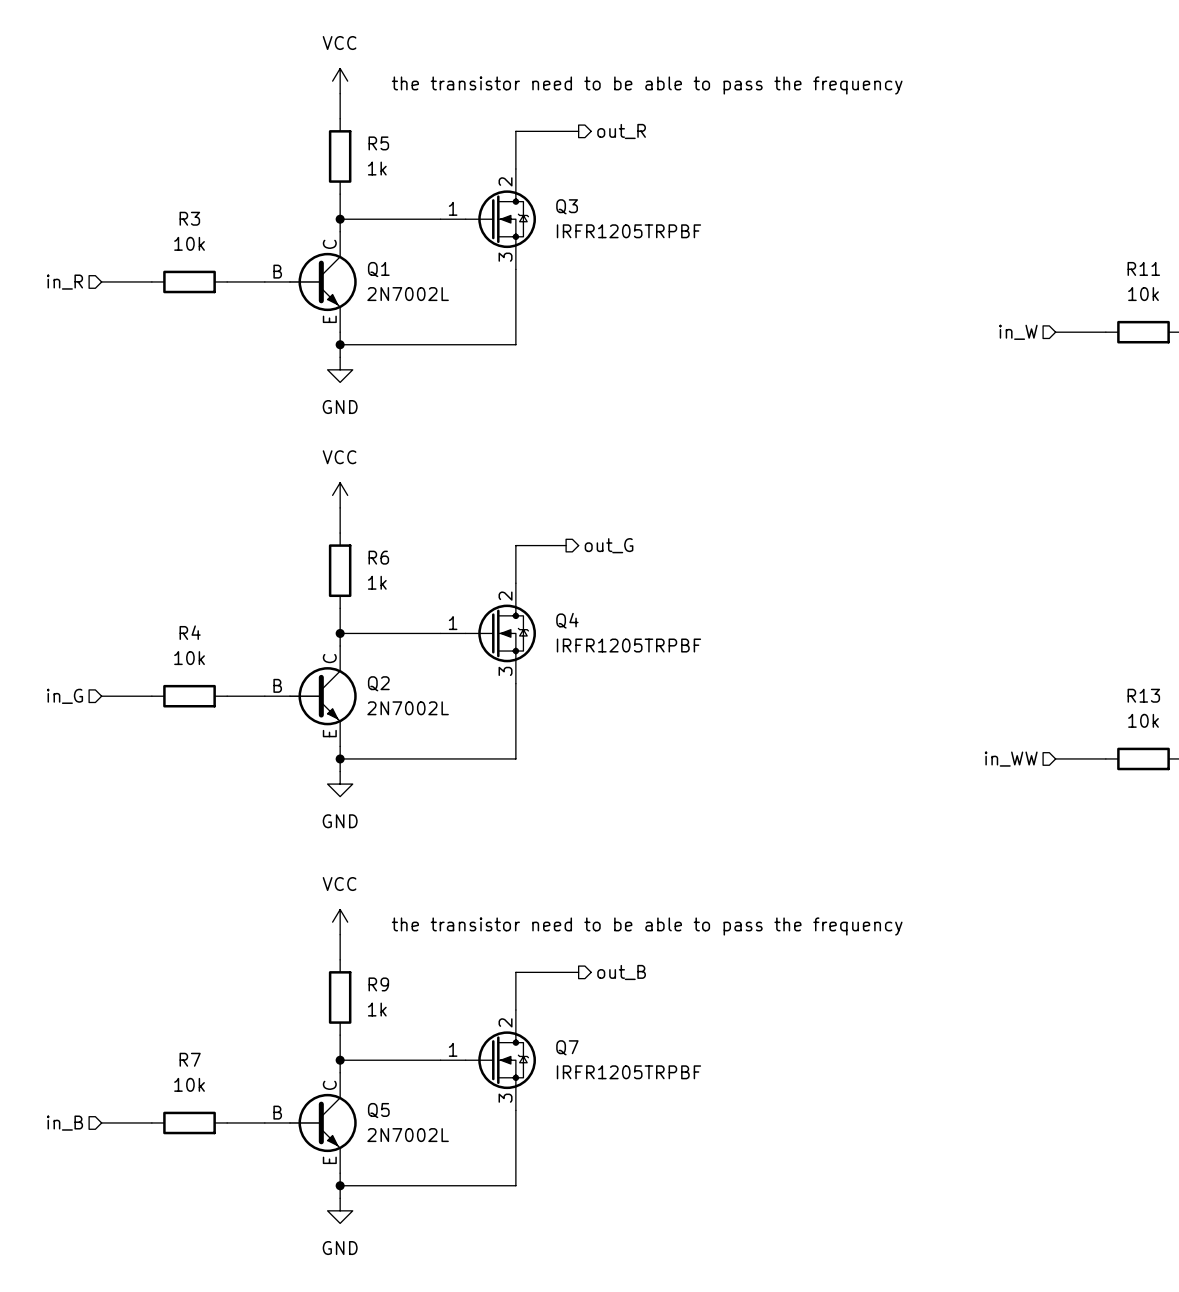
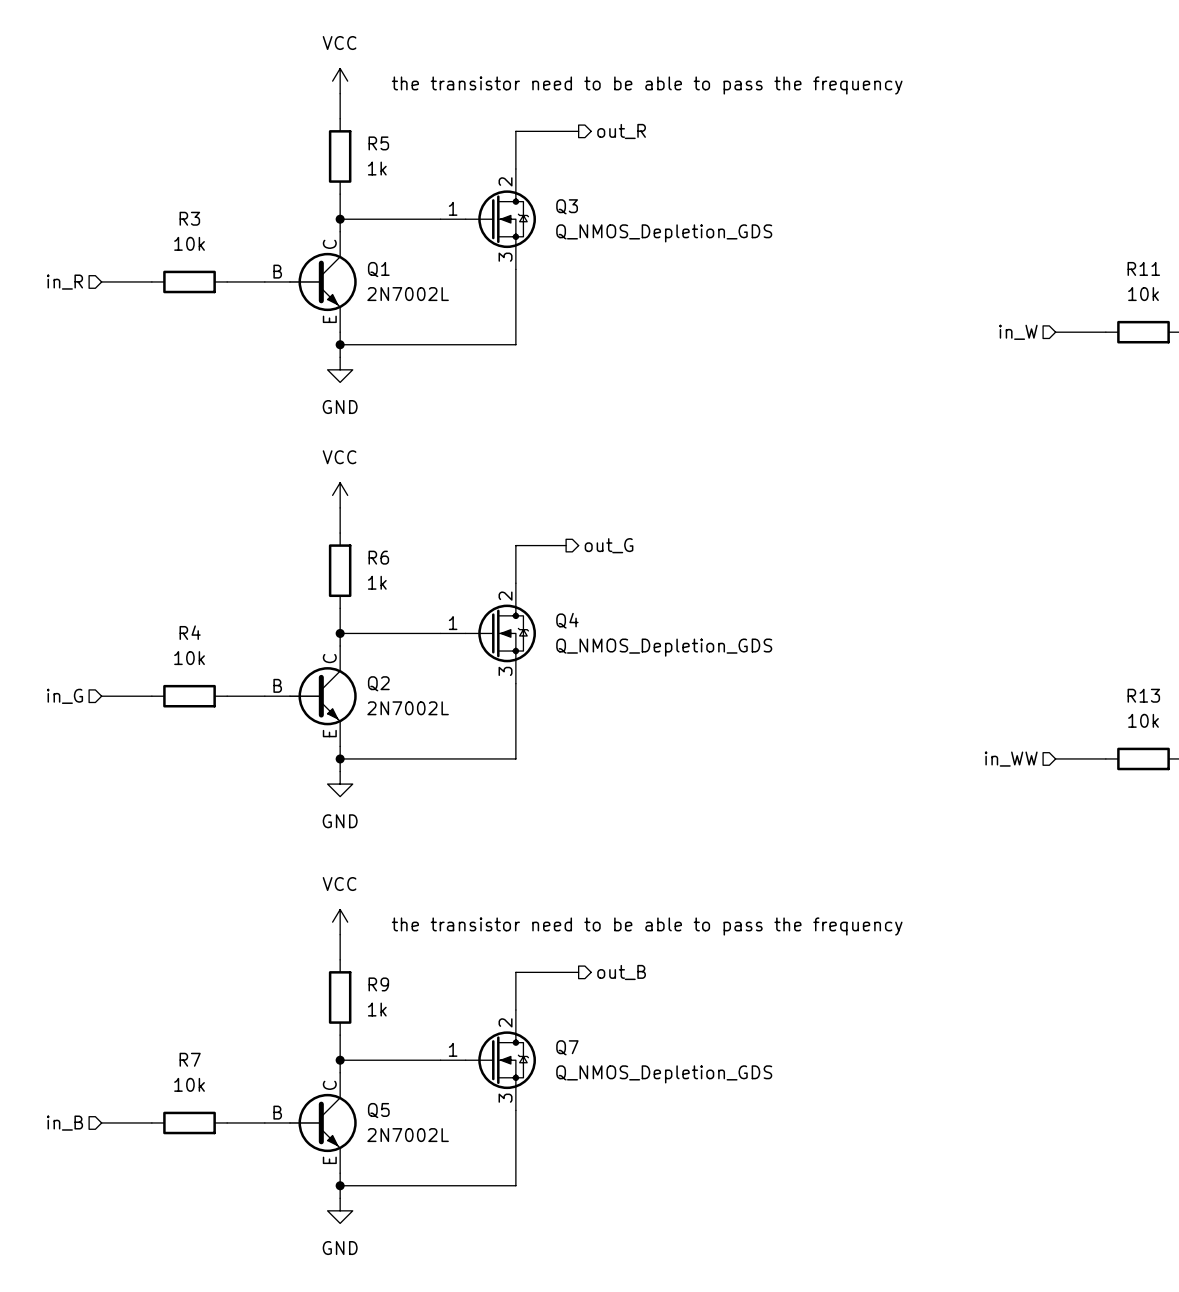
Q3 value: IRFR1205TRPBF (628, 231) -> Q_NMOS_Depletion_GDS (664, 233)
Q4 value: IRFR1205TRPBF (628, 645) -> Q_NMOS_Depletion_GDS (664, 647)
Q7 value: IRFR1205TRPBF (628, 1072) -> Q_NMOS_Depletion_GDS (664, 1074)

